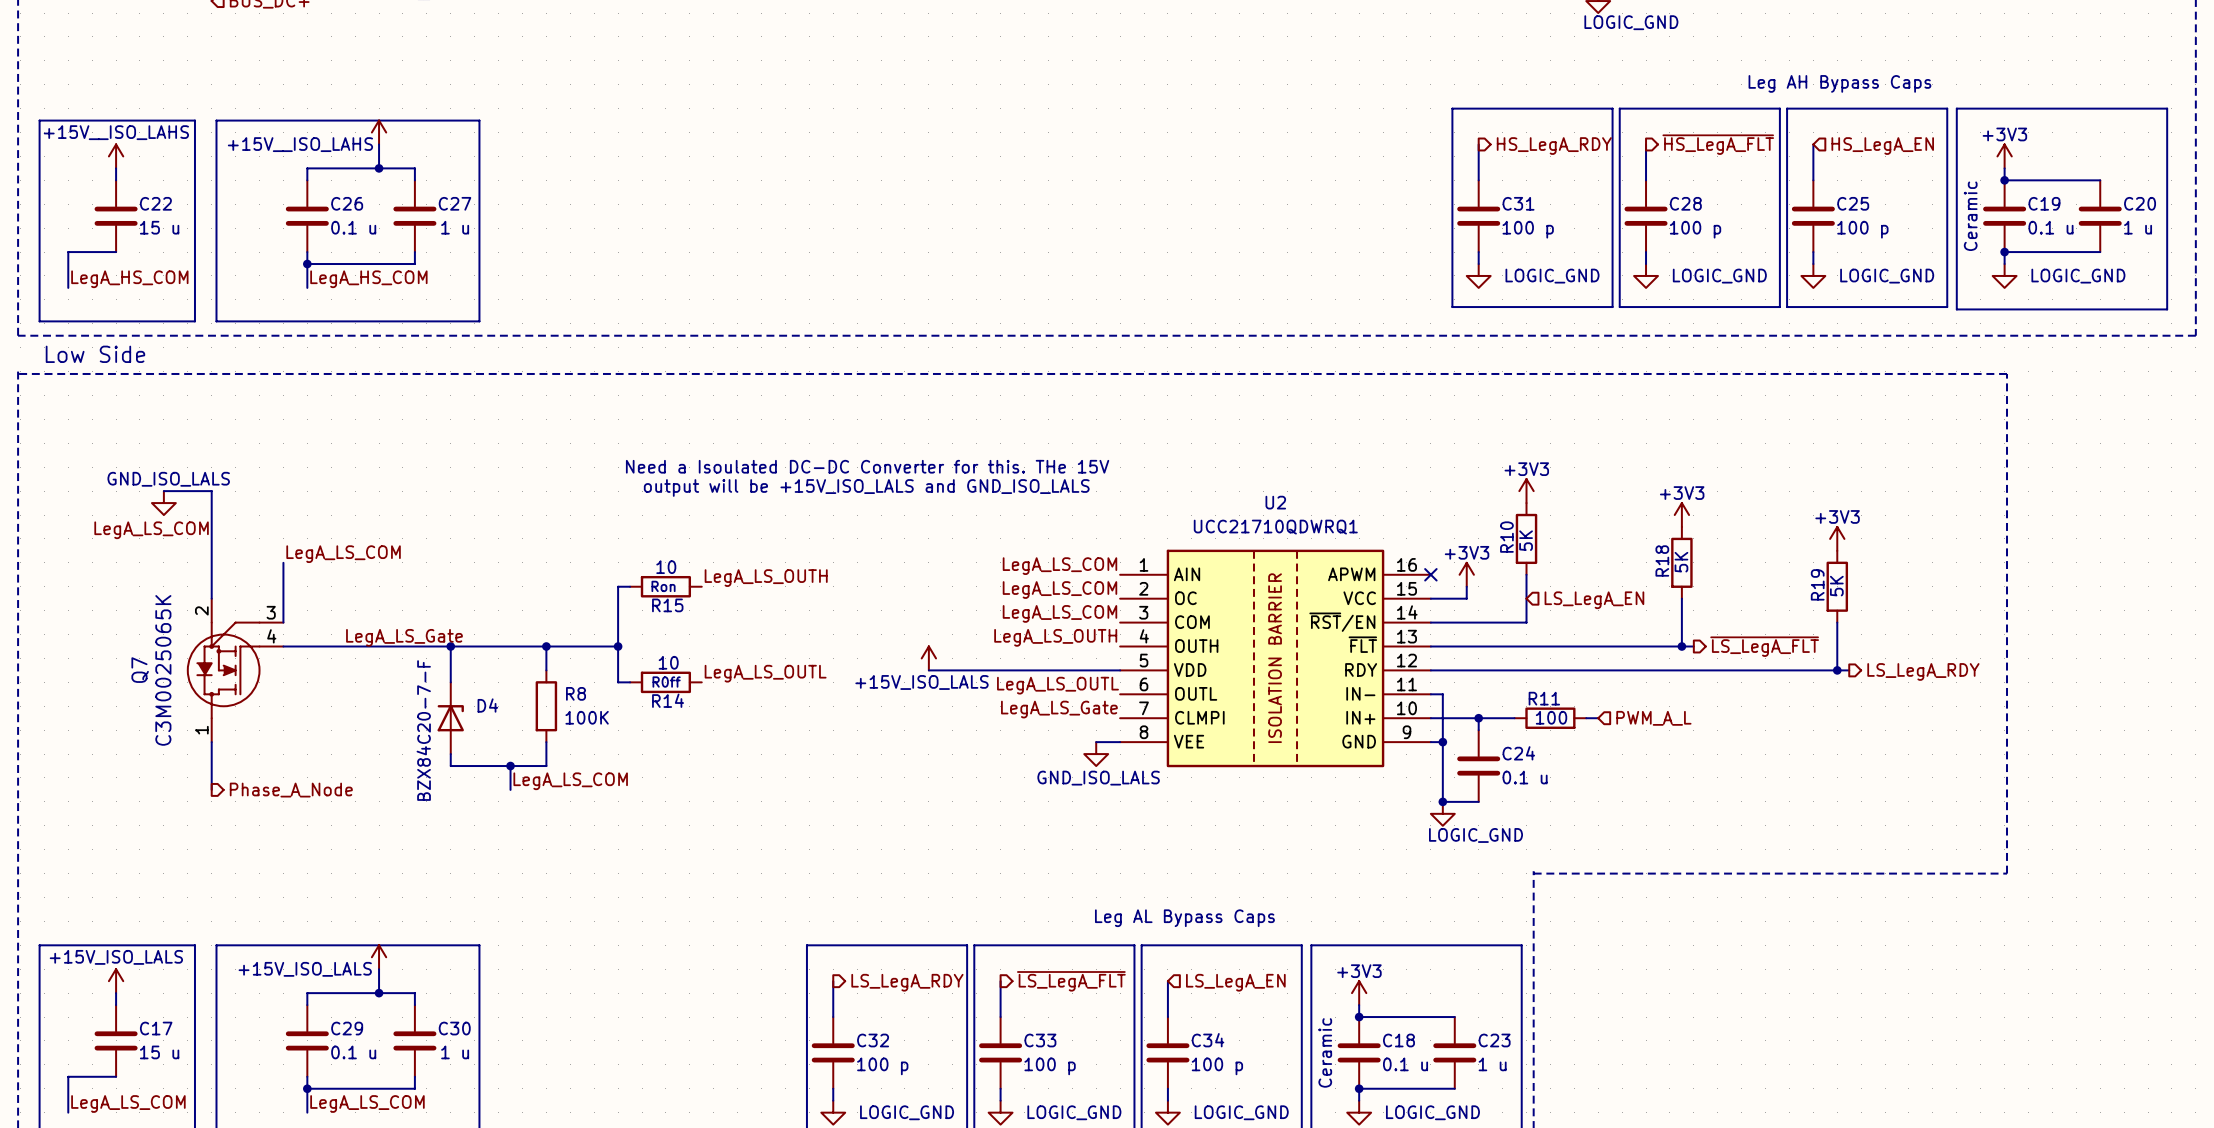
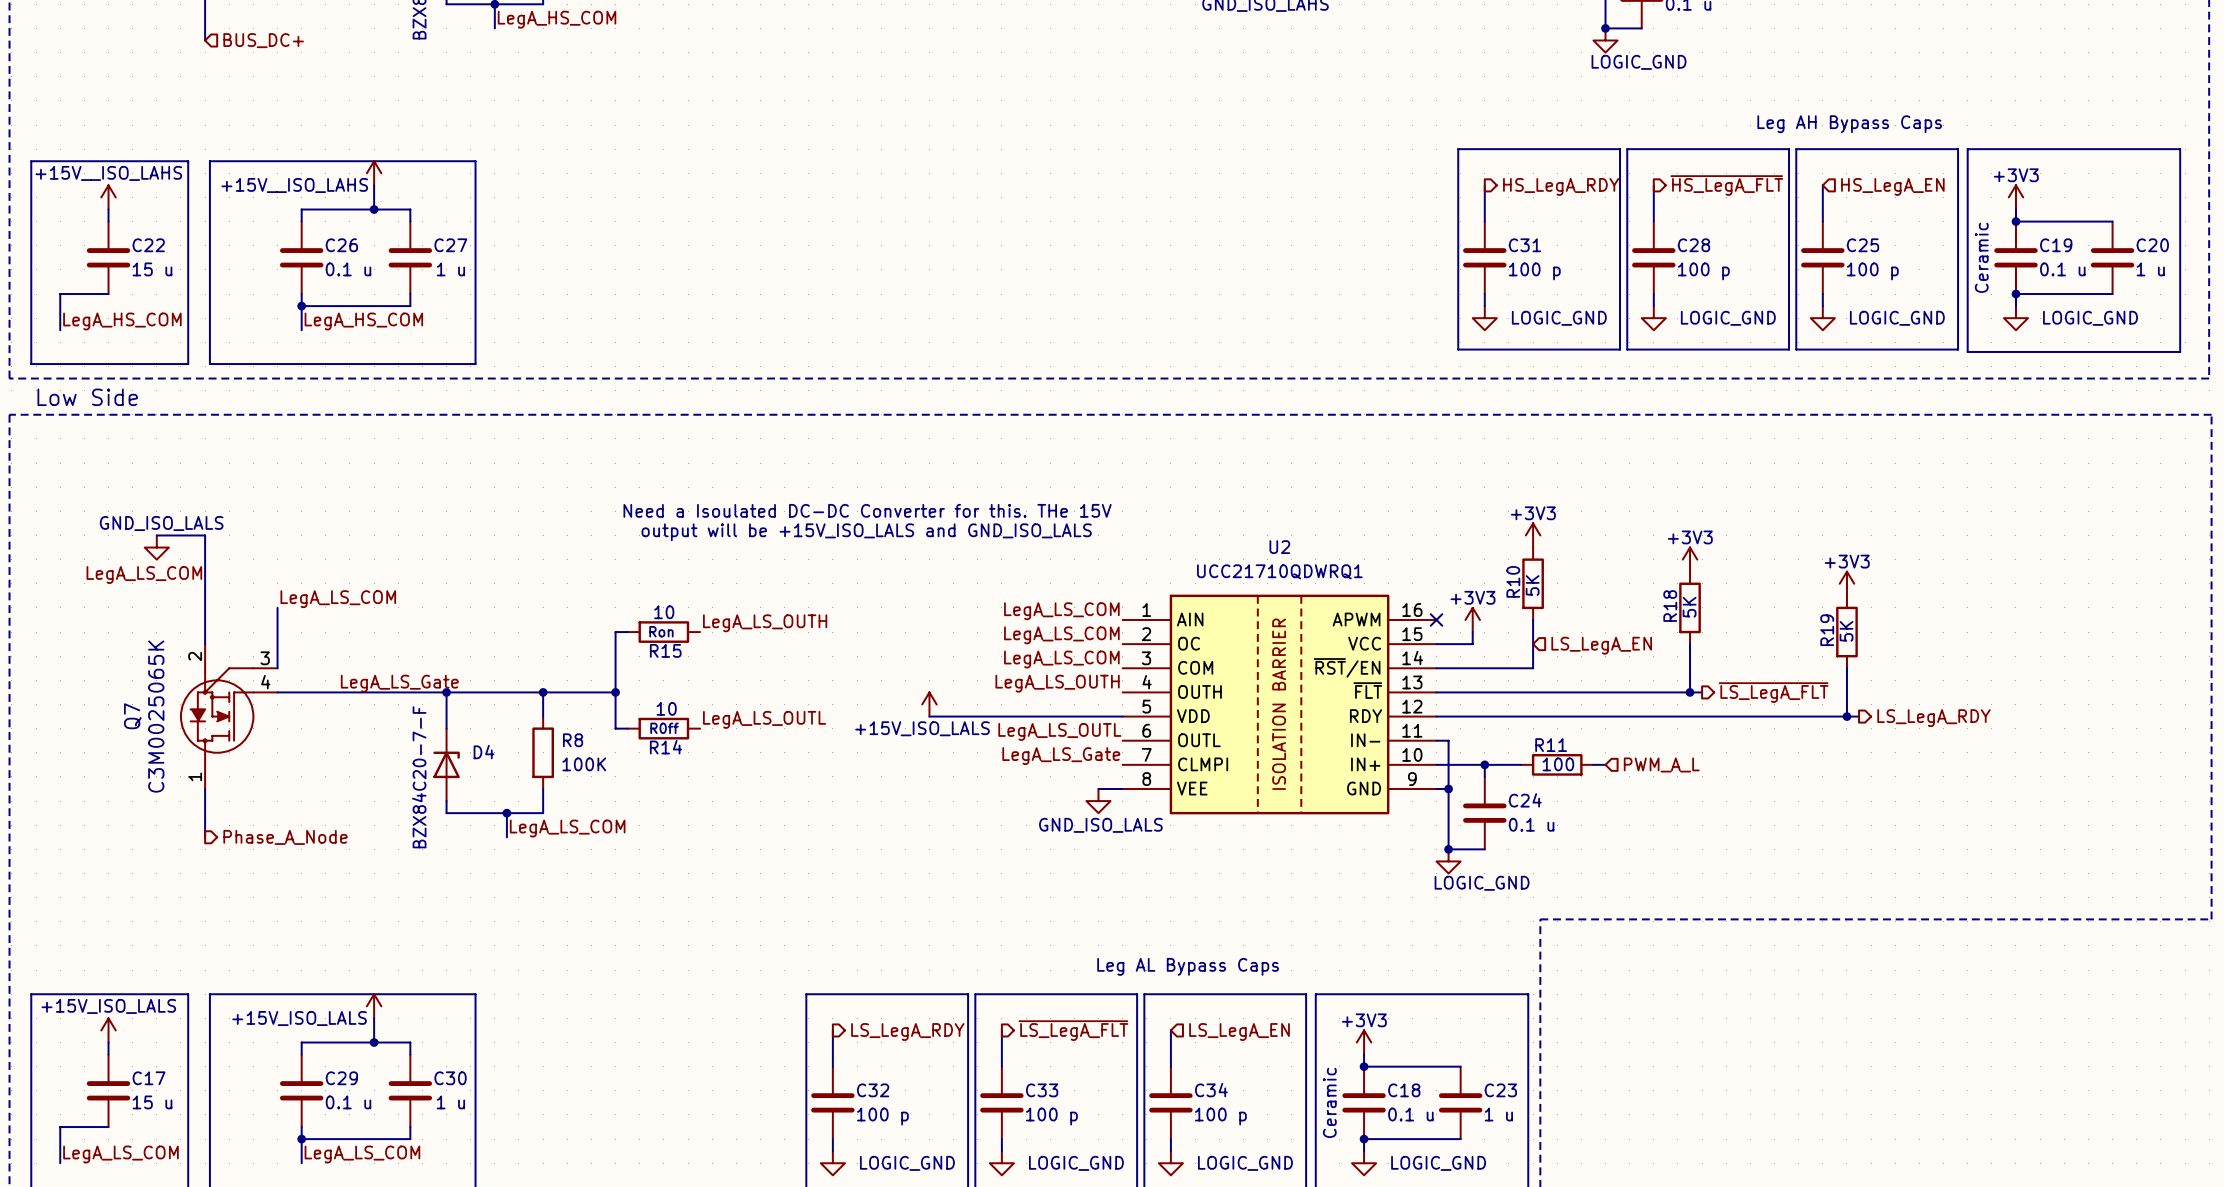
line: none -> (9, 414) (2211, 414) (2211, 919) (1540, 919)
line: (18, 373) (2007, 373) (2007, 873) (1533, 873) -> none

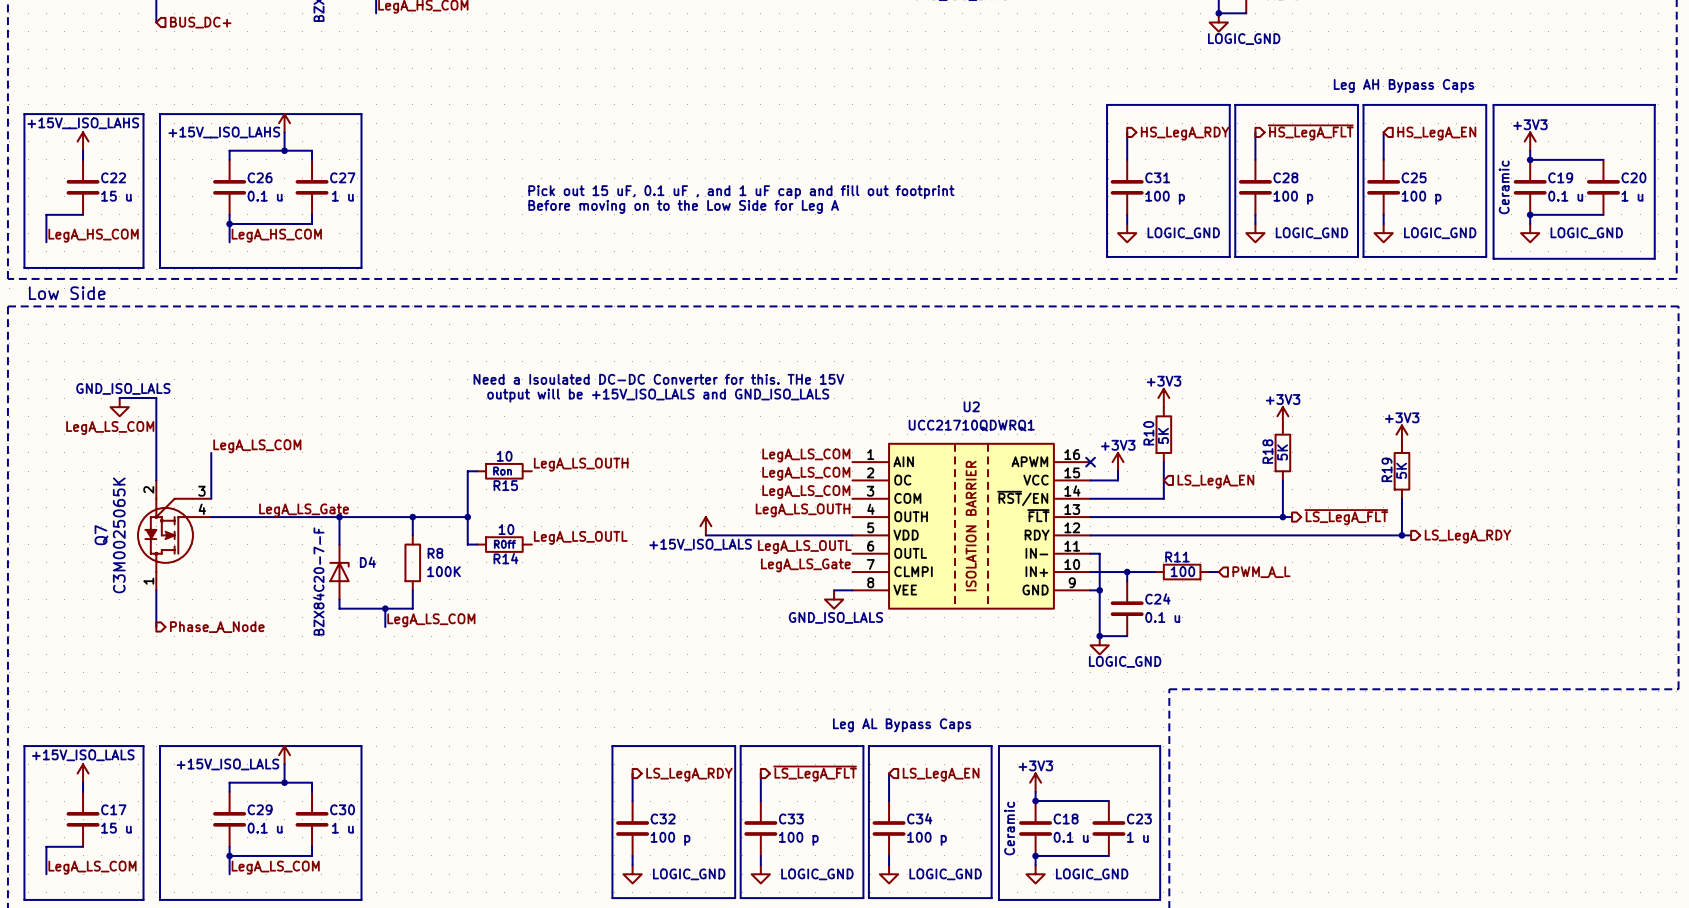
text: none -> Pick out 15 uF, 0.1 uF , and 1 uF cap and fill out footprint (741, 192)
text: none -> Before moving on to the Low Side for Leg A (683, 206)

